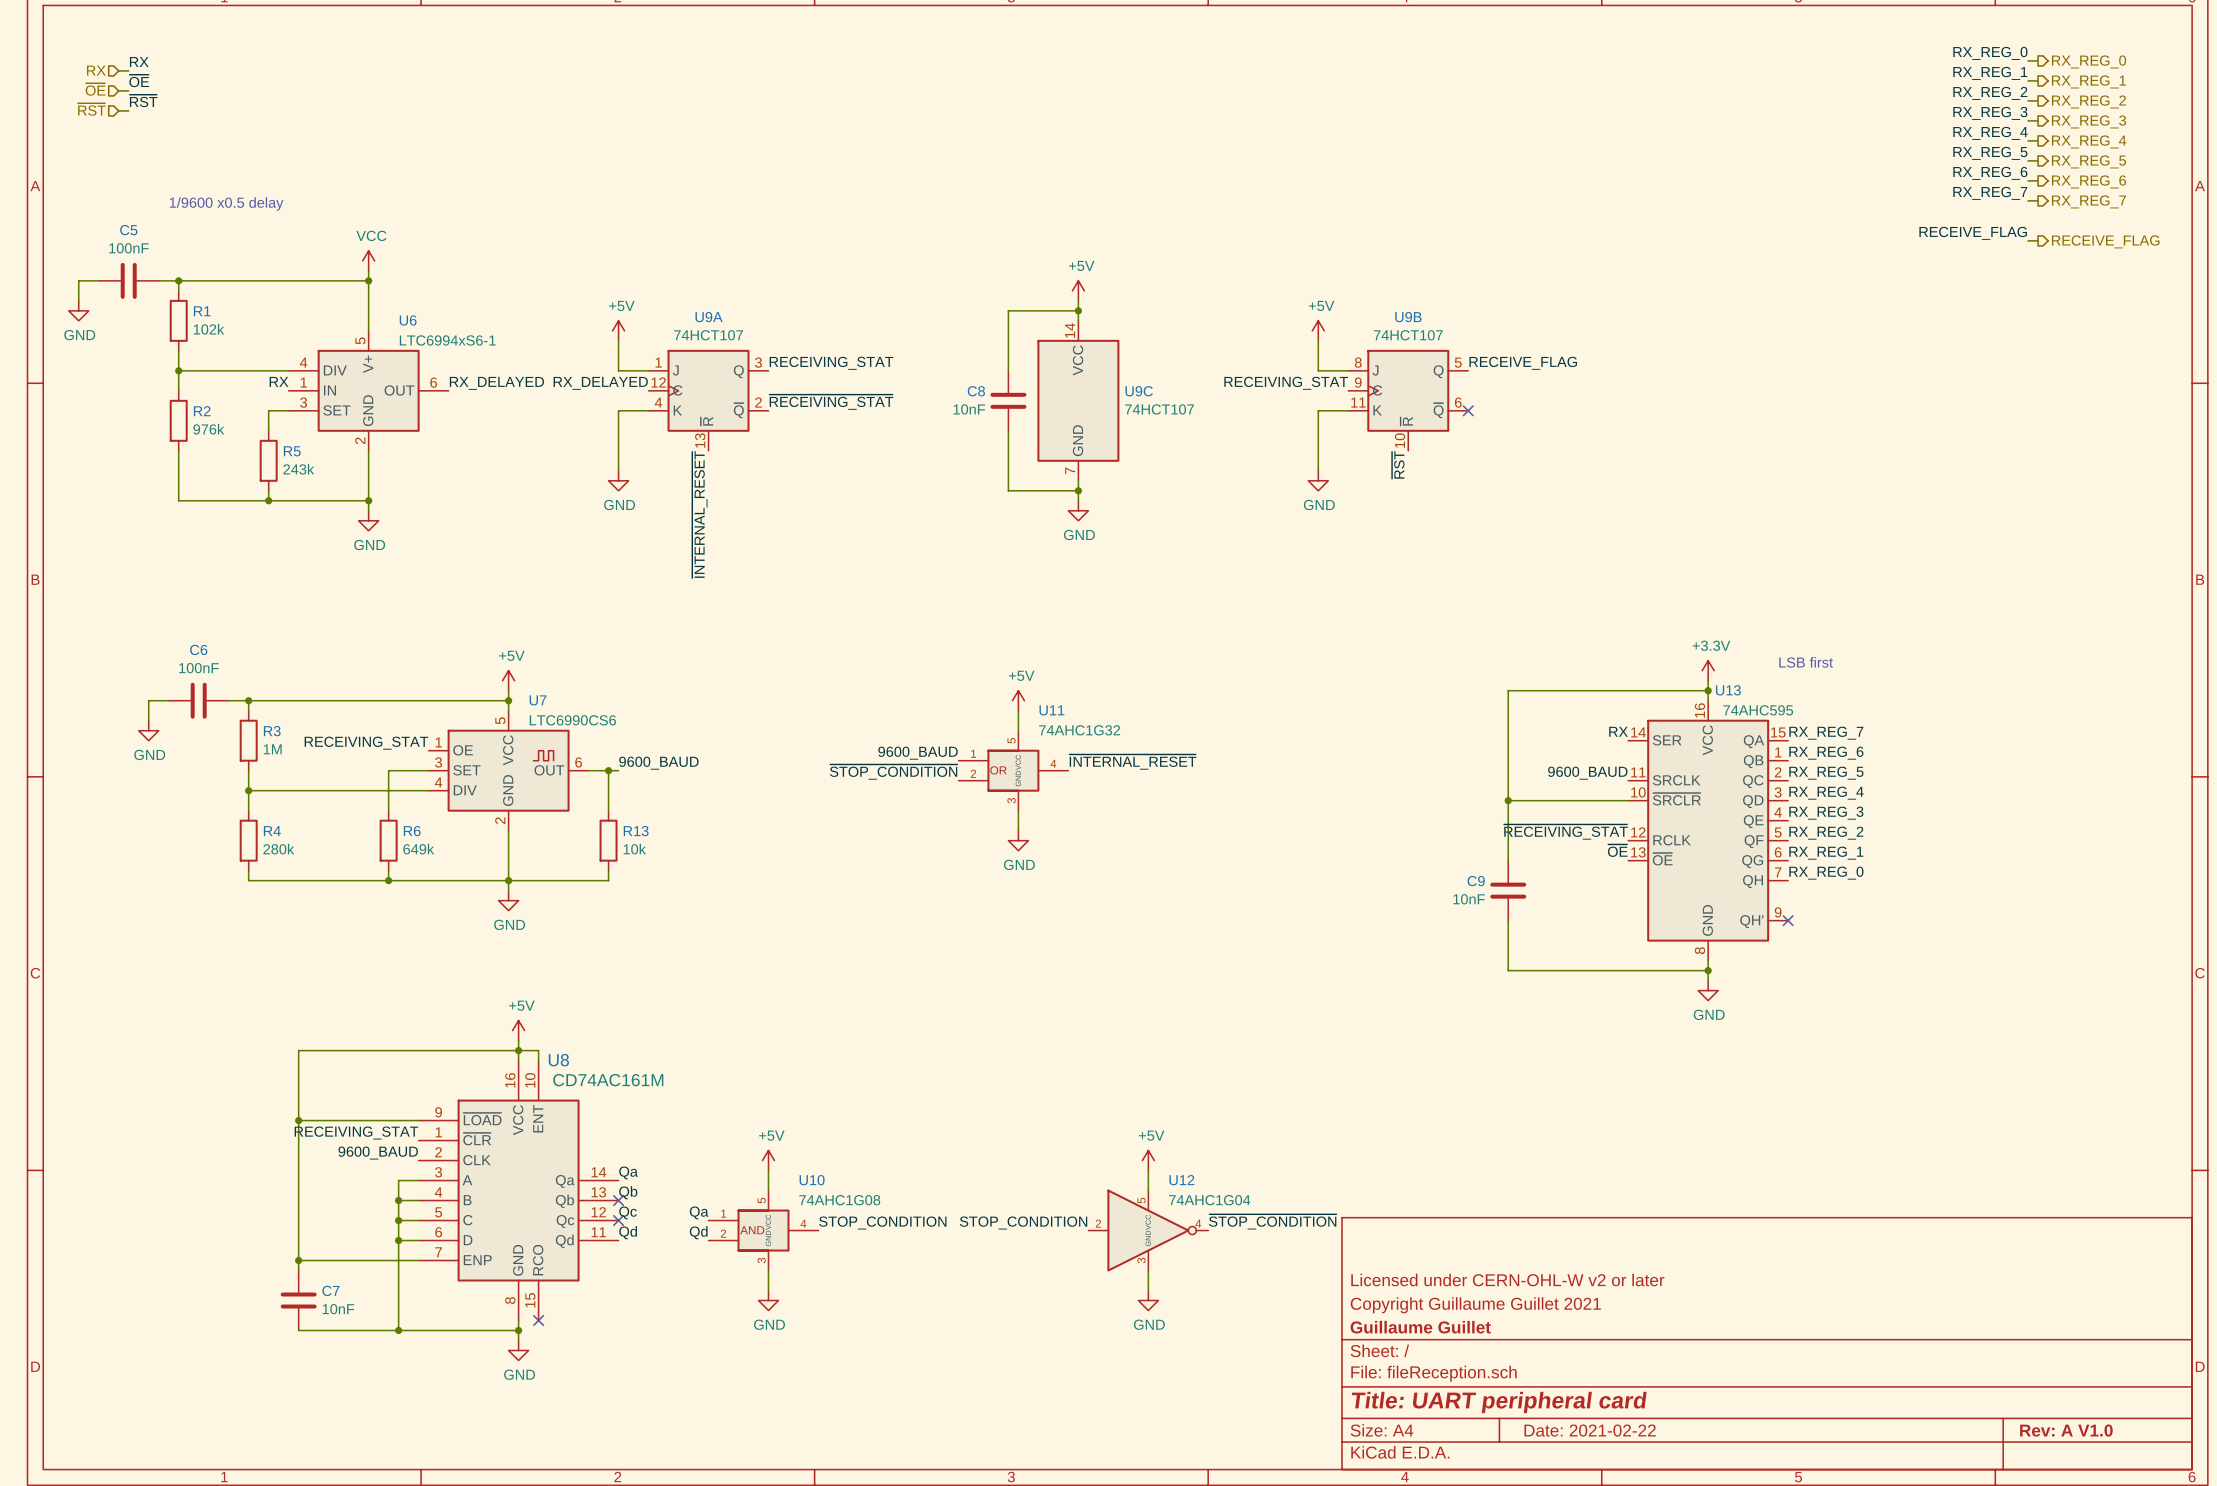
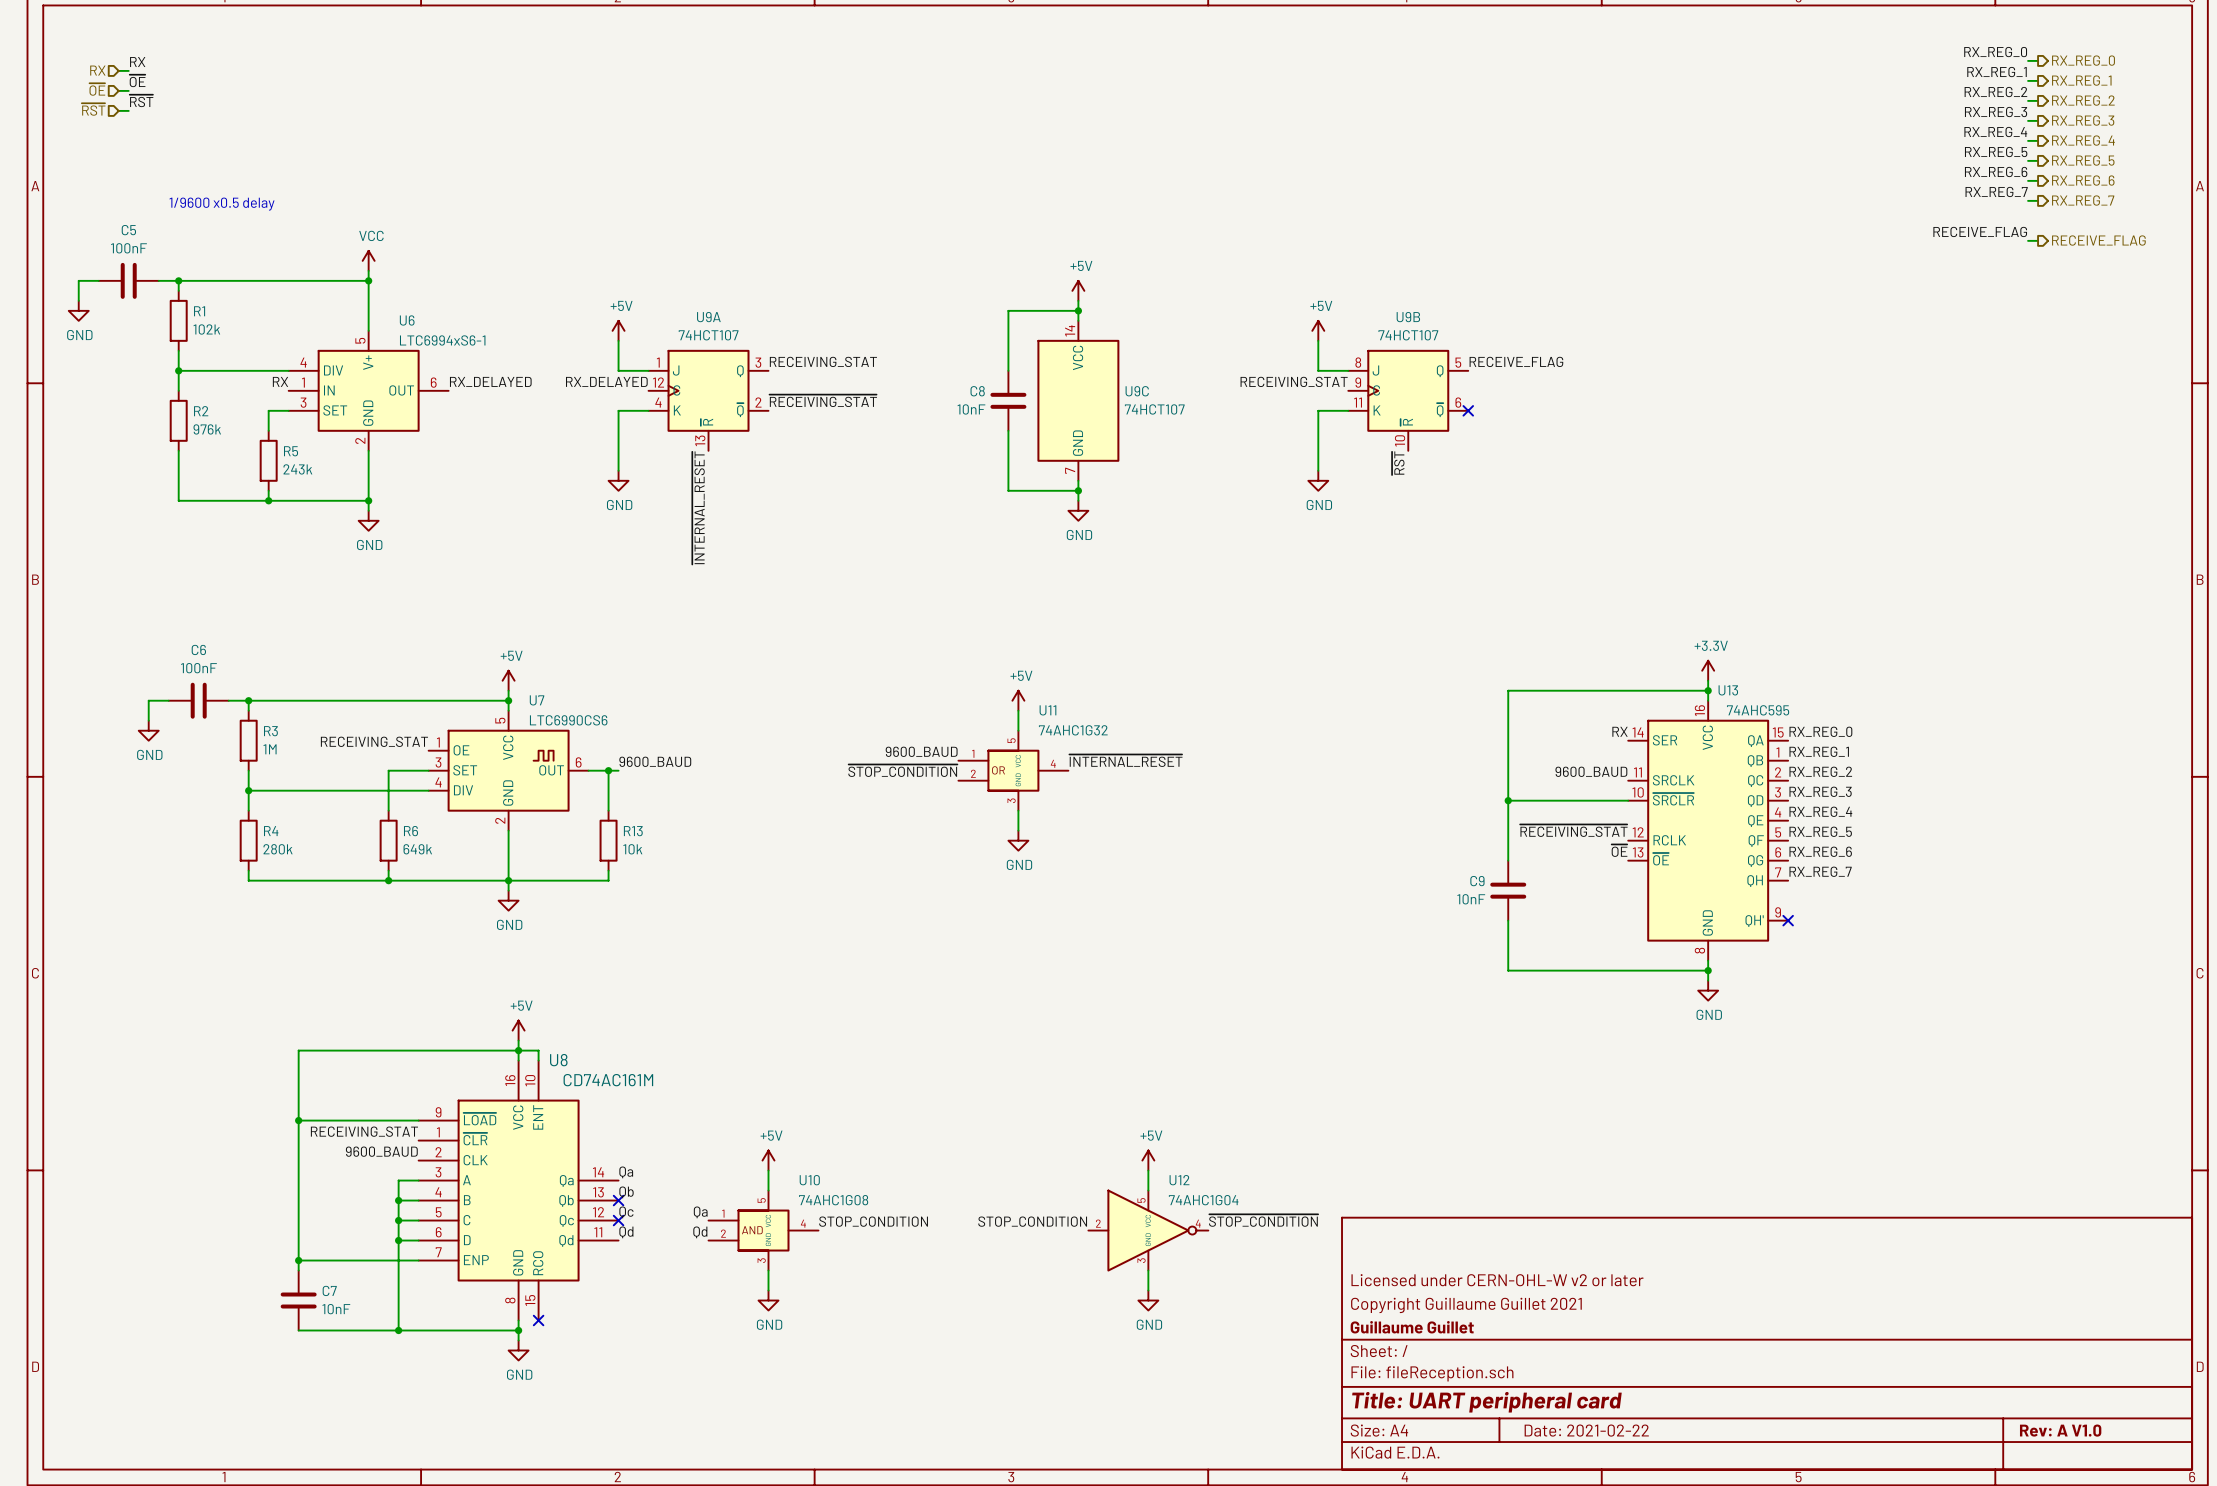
text: LSB first (1806, 662) -> none
label: RX_REG_7 (1826, 733) -> RX_REG_0 (1820, 731)
label: RX_REG_6 (1826, 753) -> RX_REG_1 (1819, 751)
label: RX_REG_5 (1826, 773) -> RX_REG_2 (1820, 771)
label: RX_REG_4 (1826, 793) -> RX_REG_3 (1820, 791)
label: RX_REG_3 (1826, 813) -> RX_REG_4 (1820, 811)
label: RX_REG_2 (1826, 833) -> RX_REG_5 (1820, 831)
label: RX_REG_1 (1826, 853) -> RX_REG_6 (1820, 851)
label: RX_REG_0 (1826, 873) -> RX_REG_7 (1820, 871)

